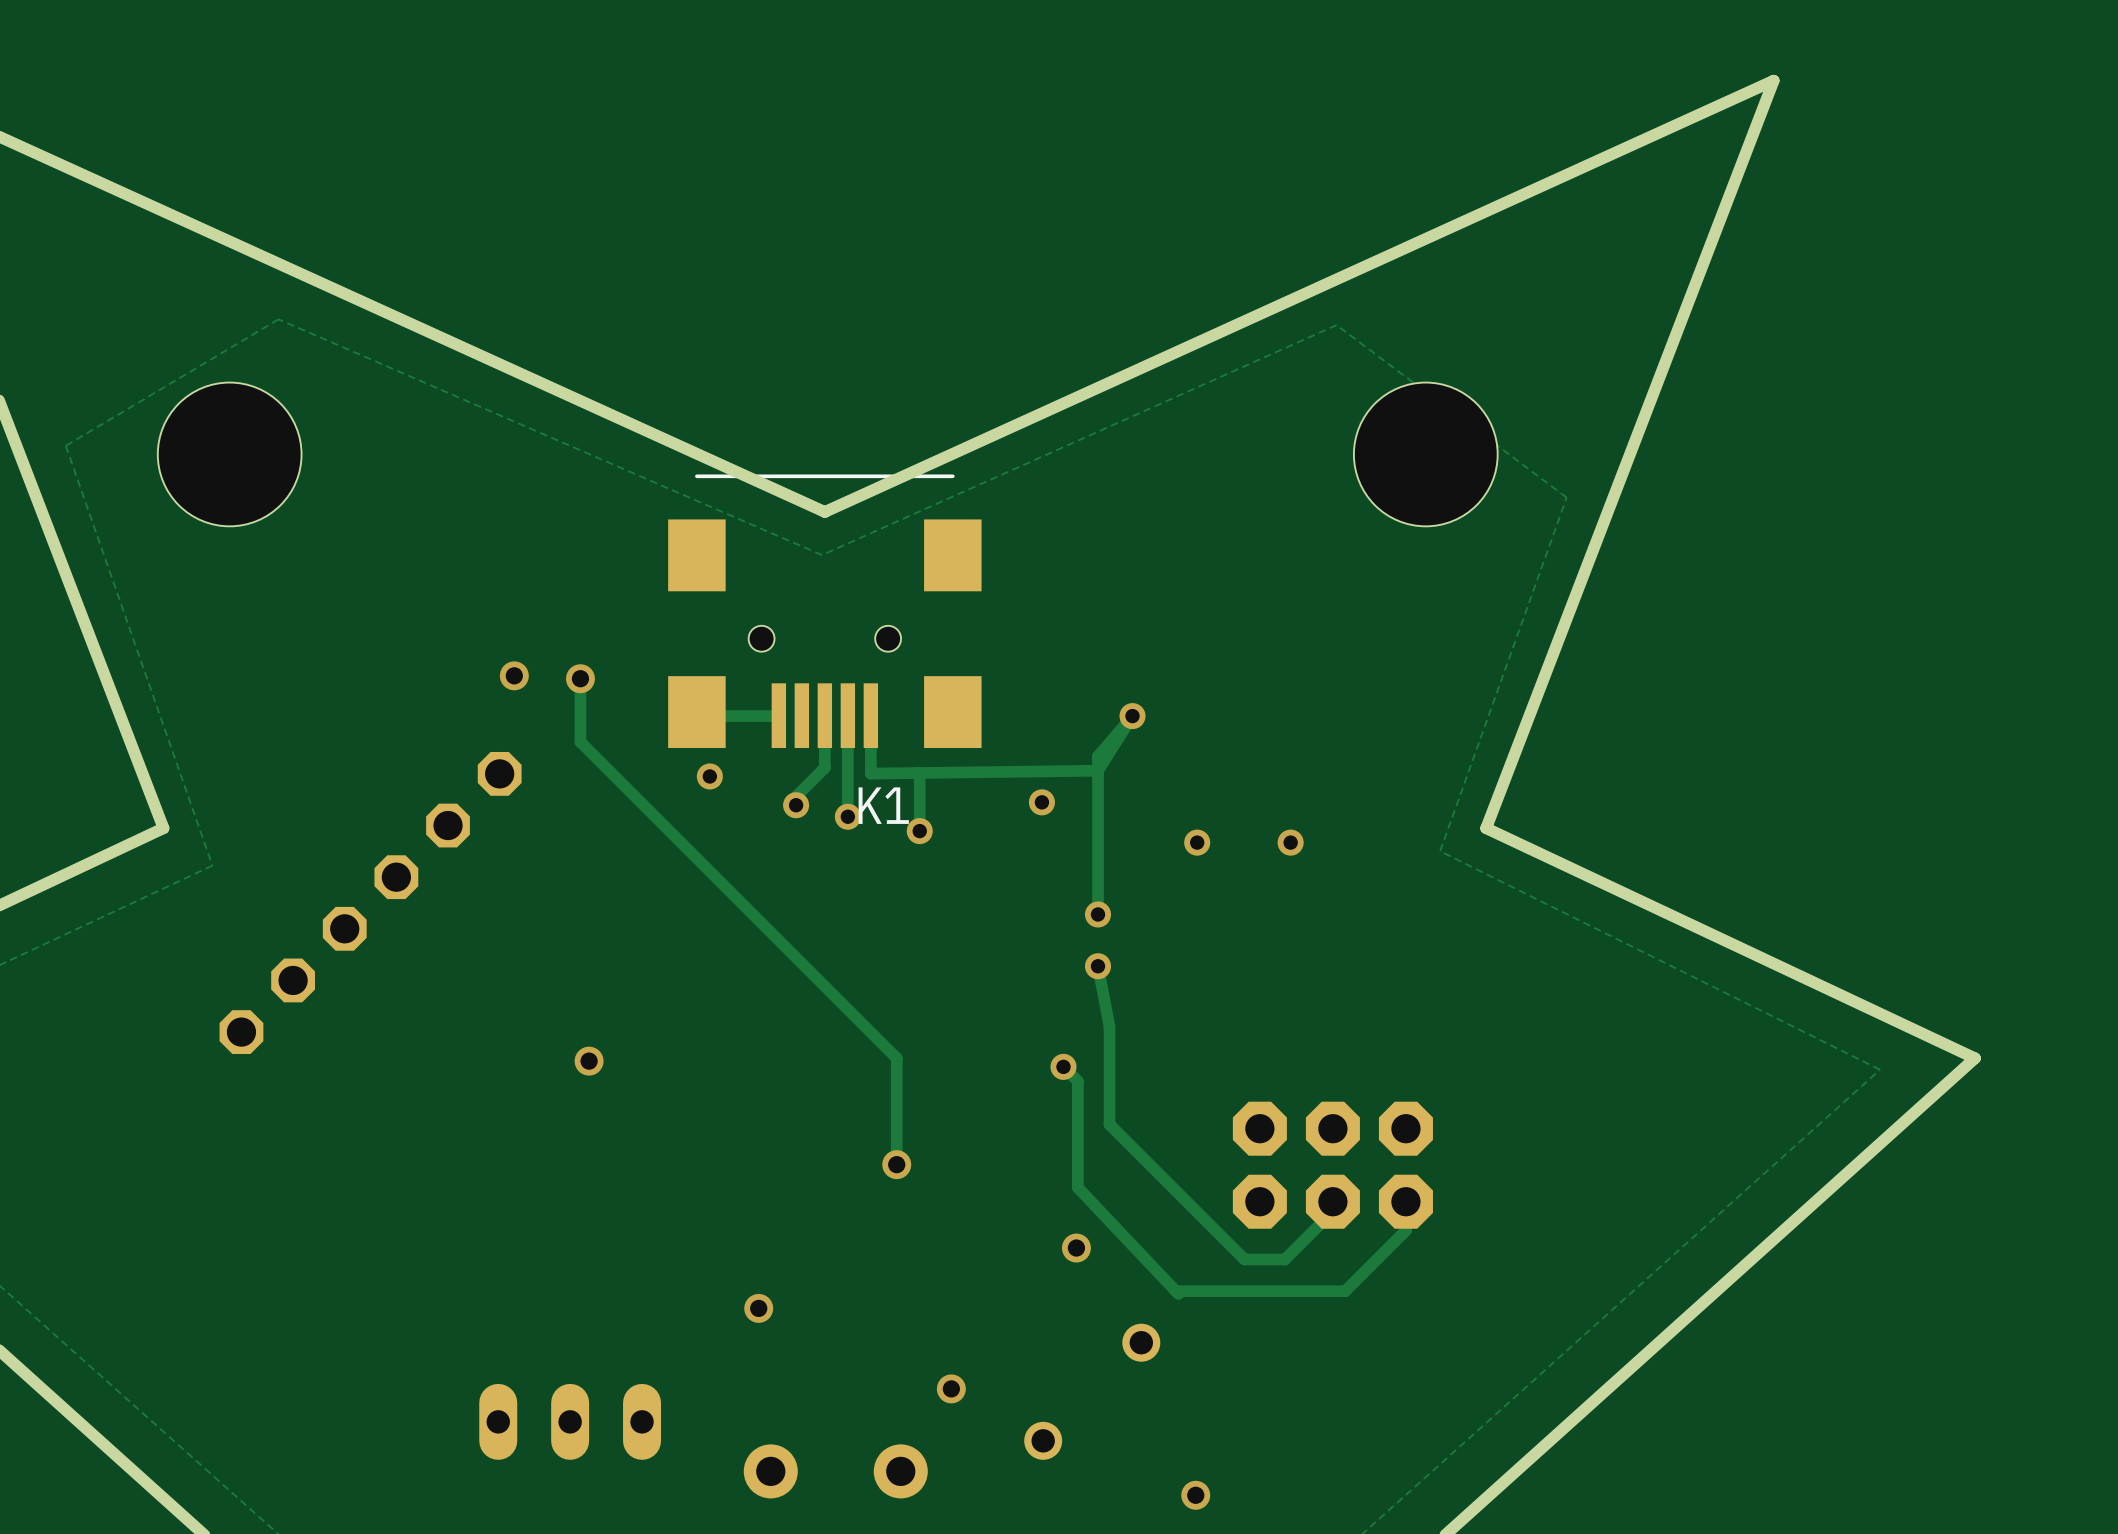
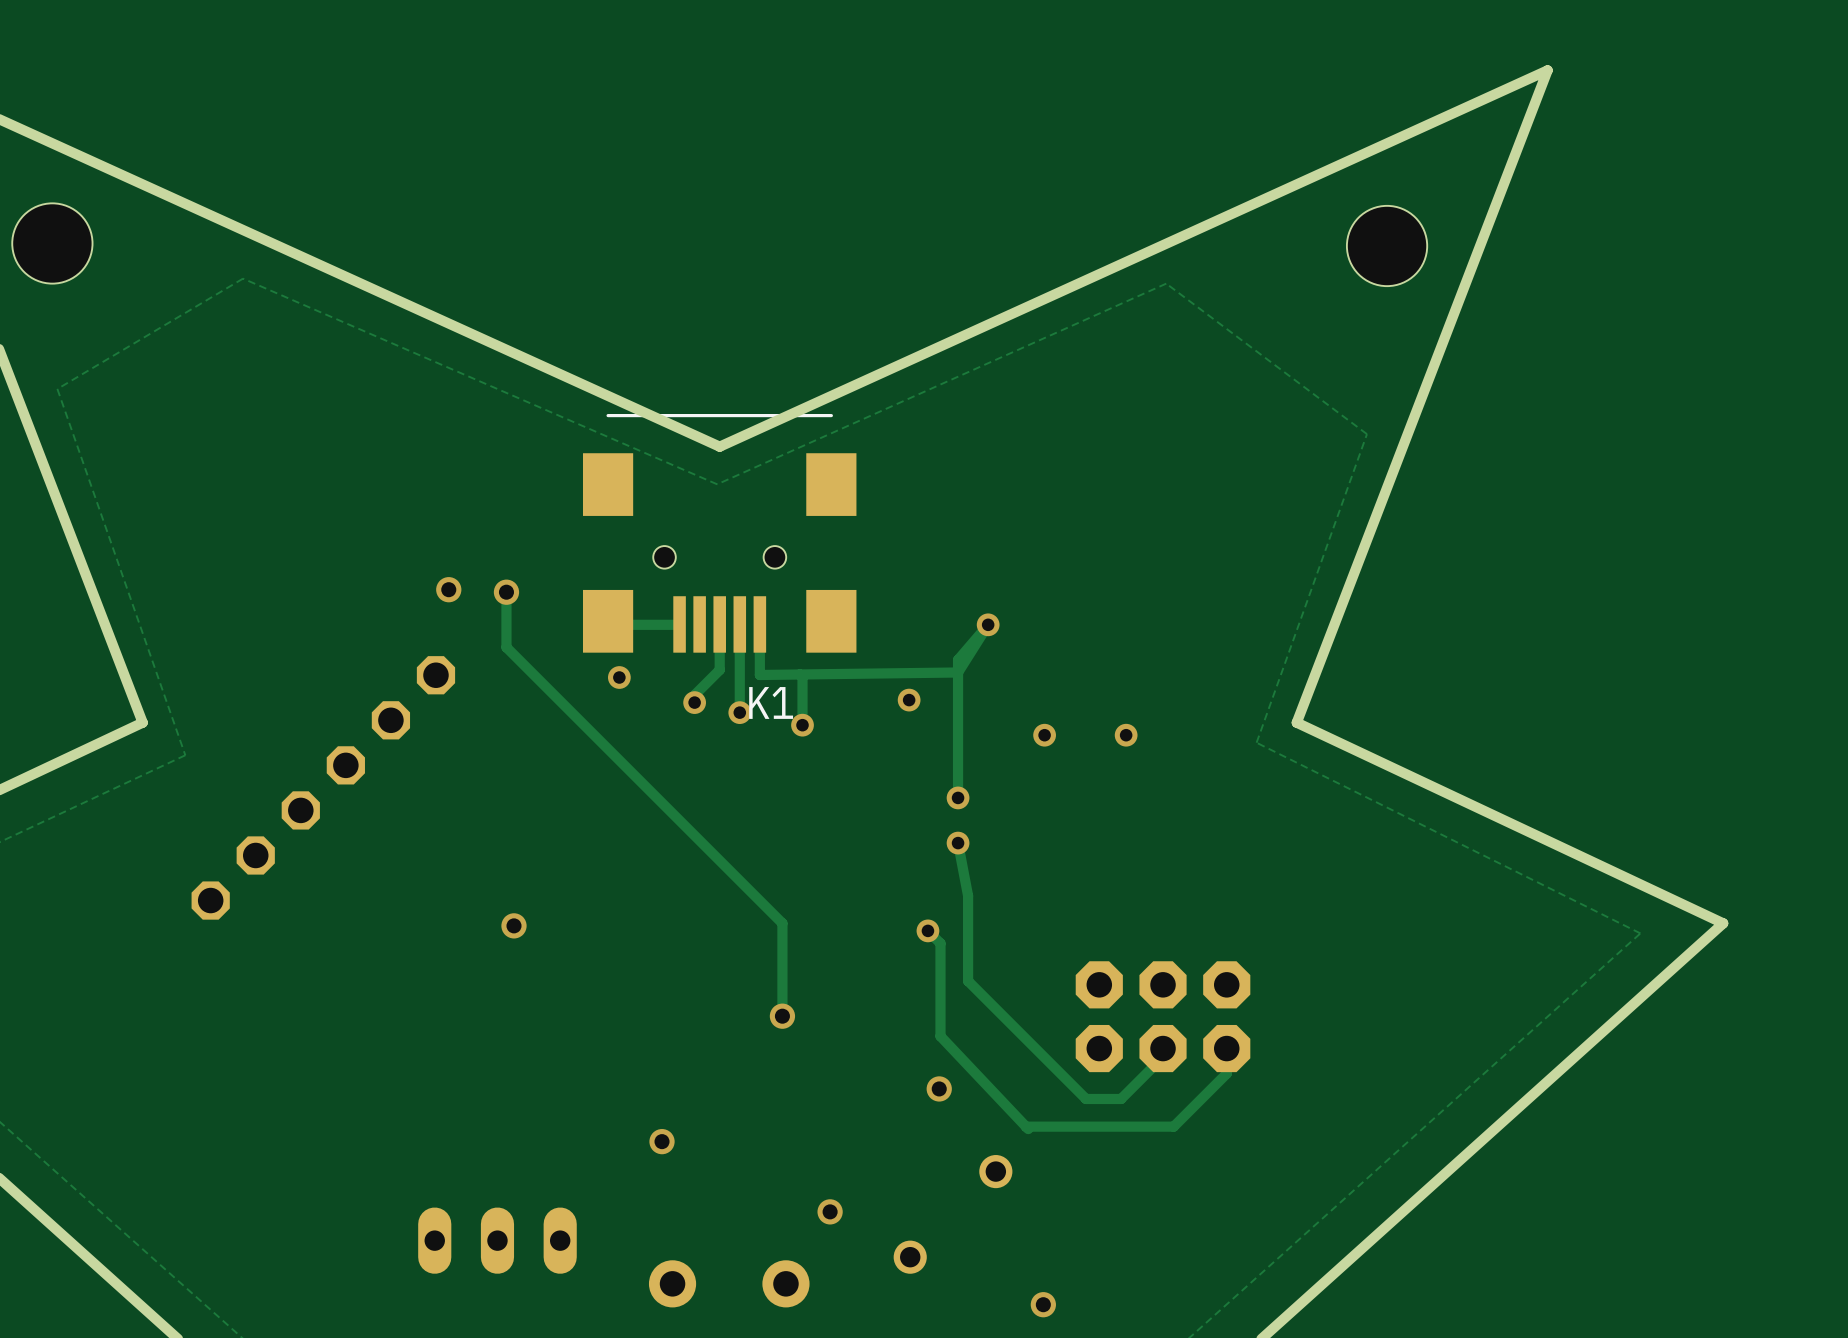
hole: none -> (52, 243)
hole: none -> (1387, 245)
hole: (229, 454) -> none
hole: (1425, 454) -> none

